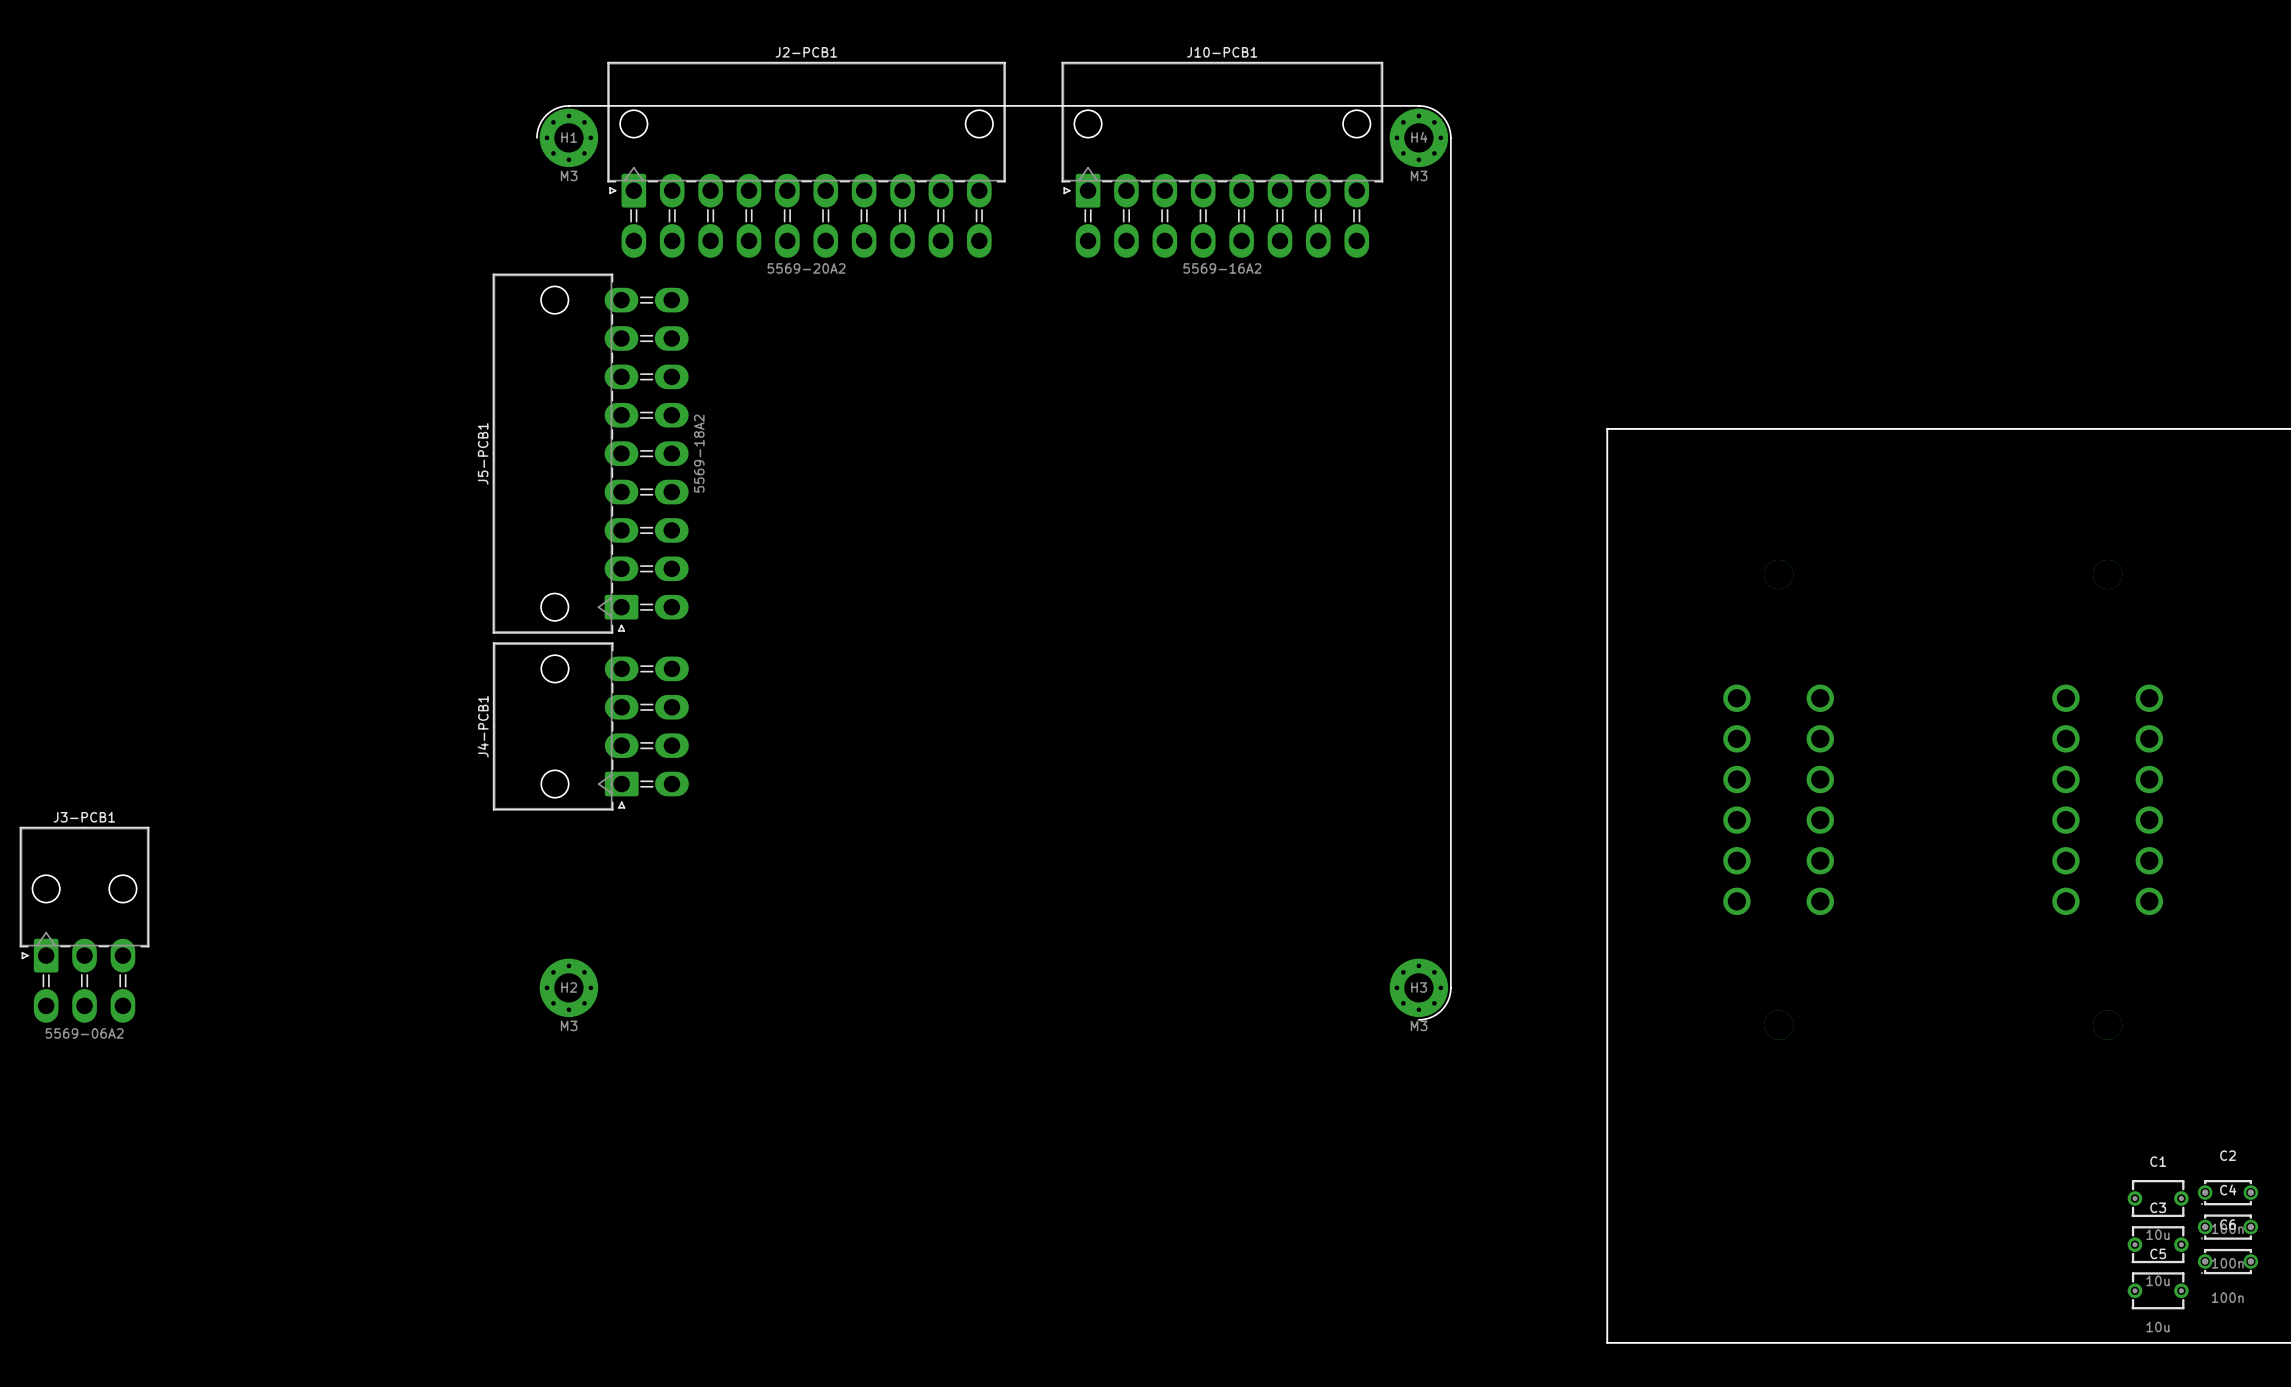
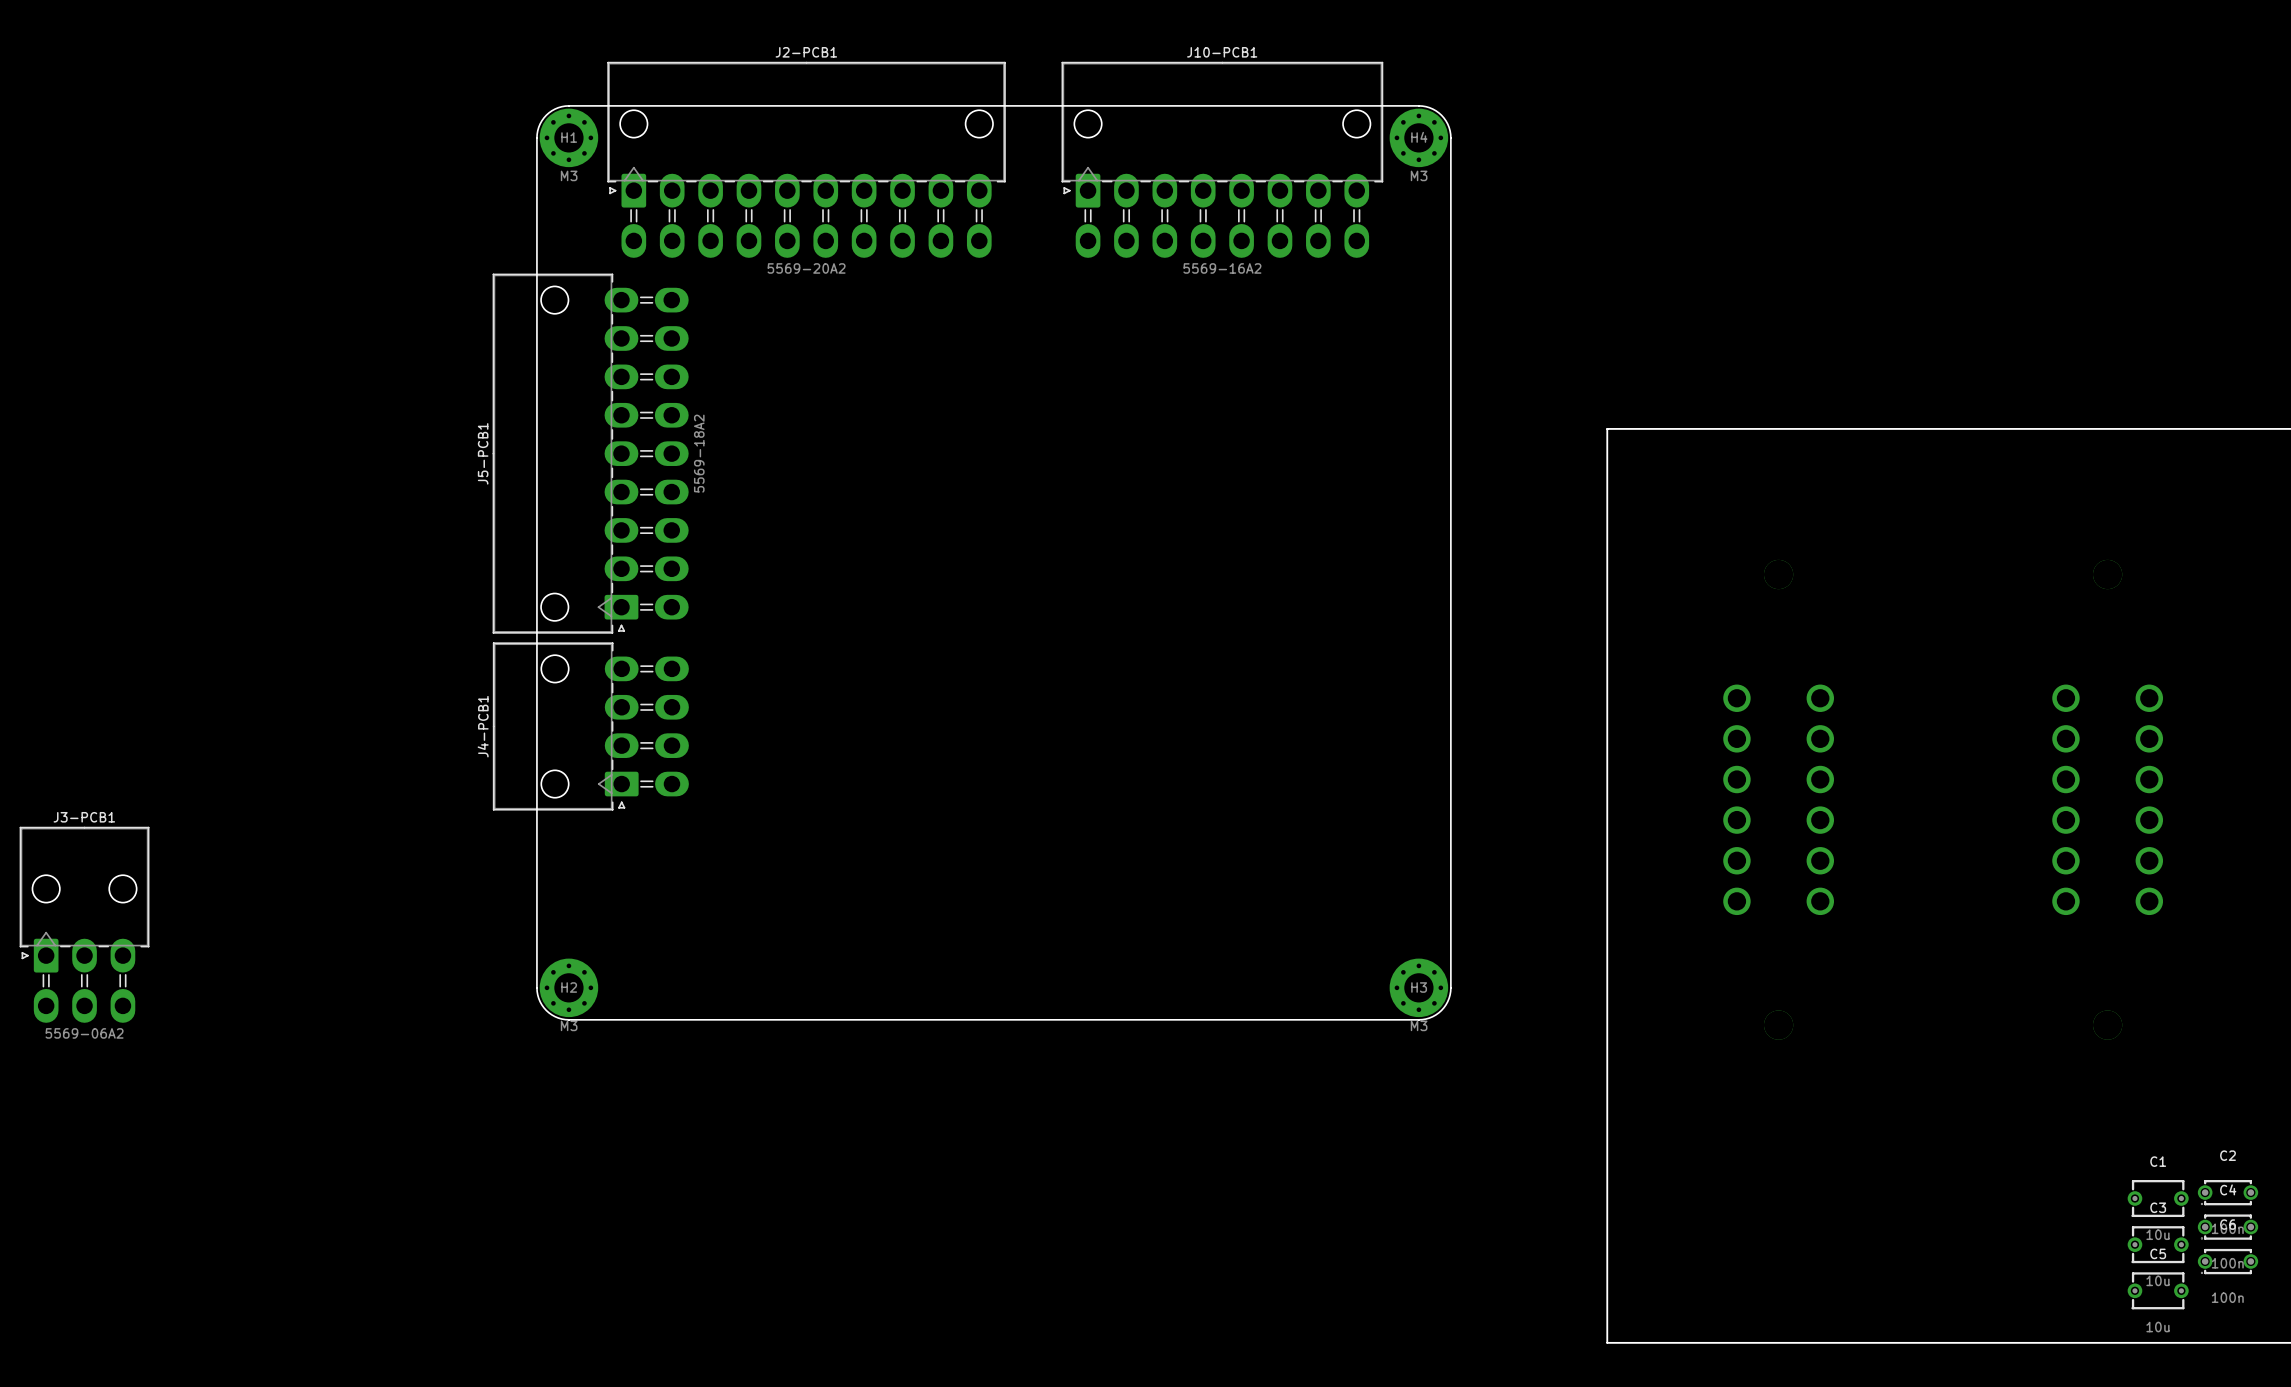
board edge: none -> (536, 137) (536, 987) (540, 1001) (546, 1010) (555, 1016) (568, 1019) (1418, 1019)

